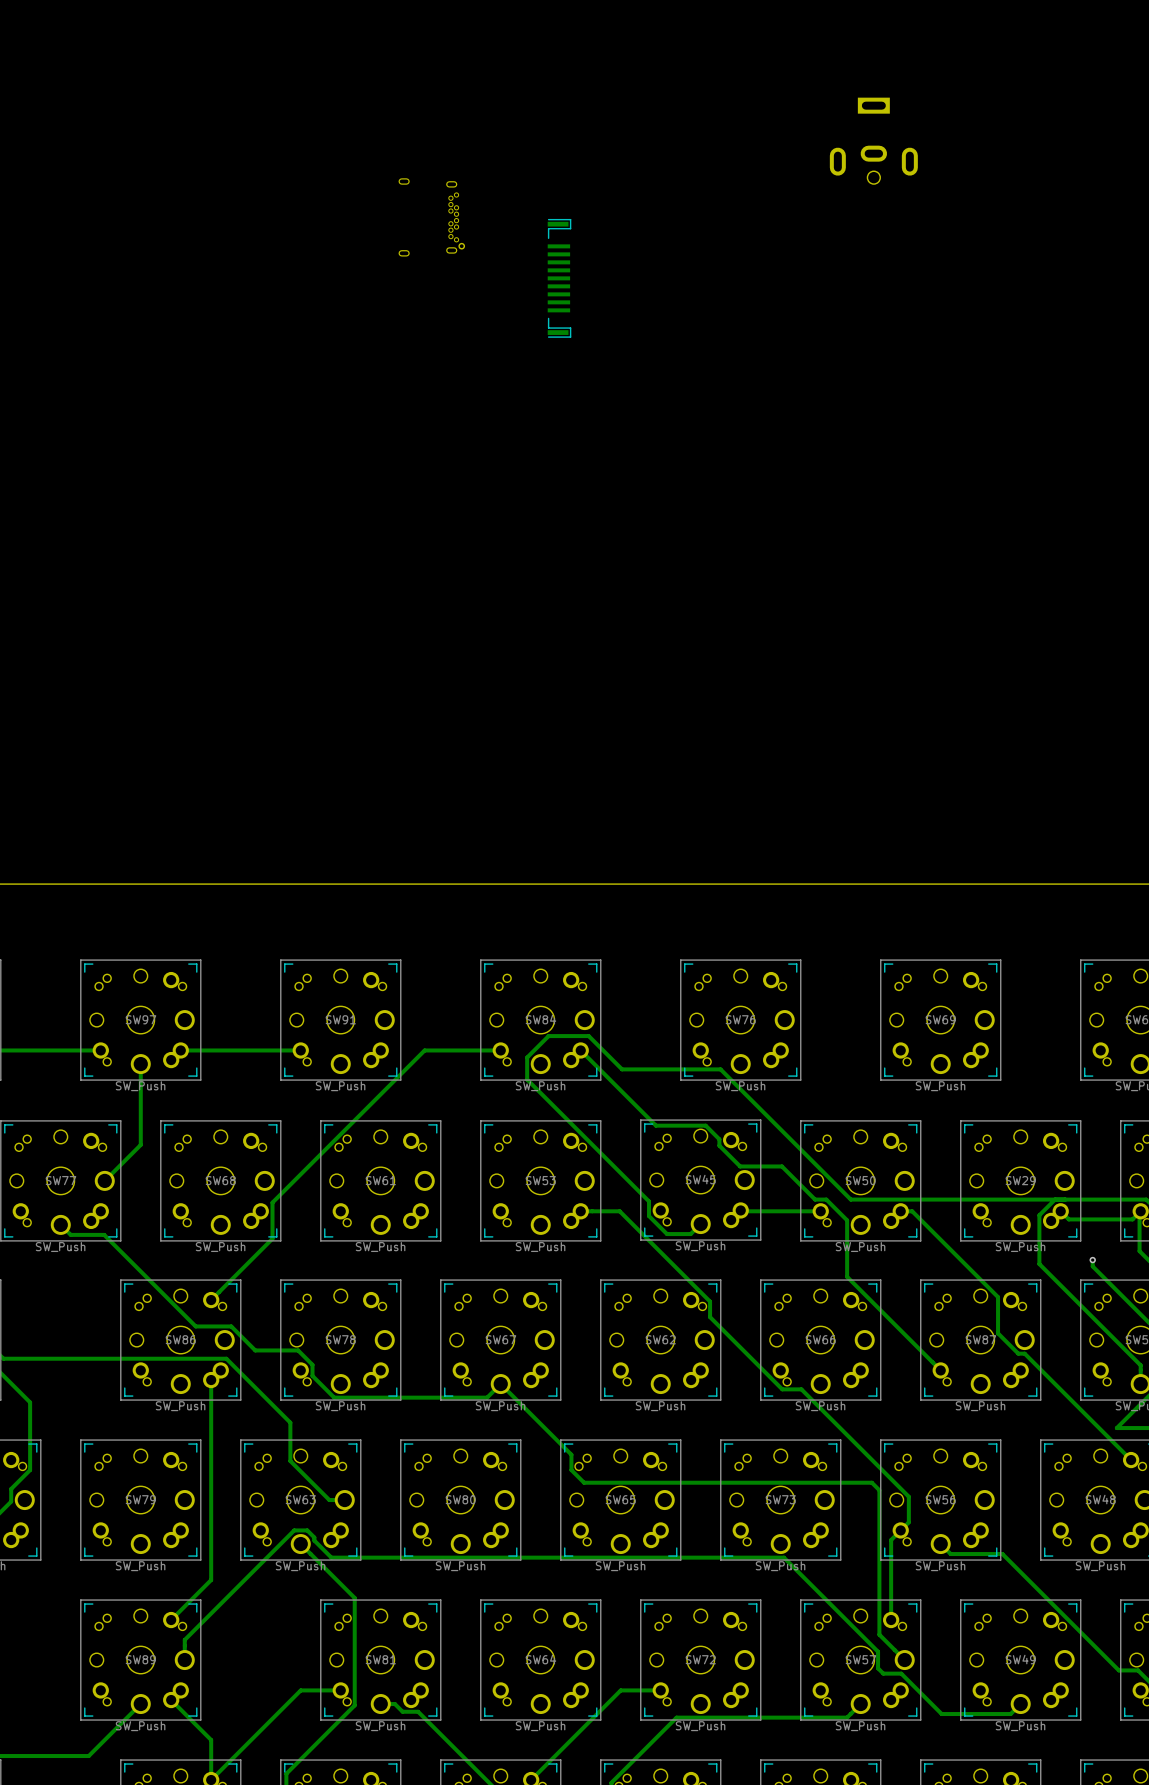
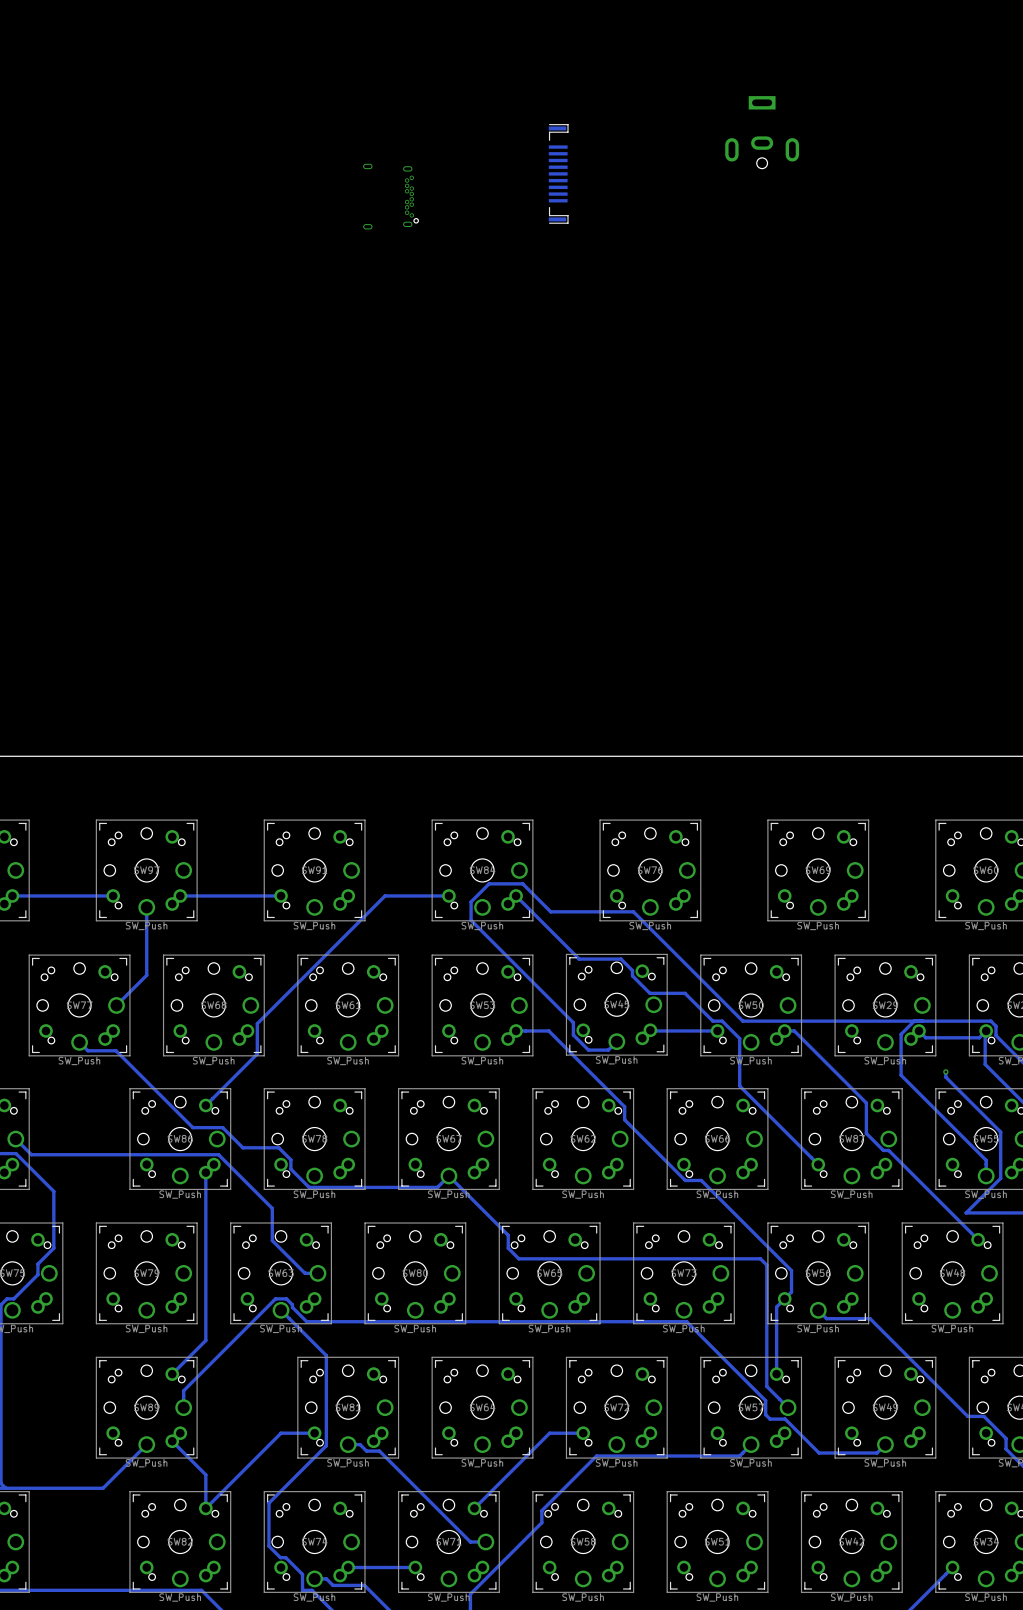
part position: (559, 278) -> (558, 173)

